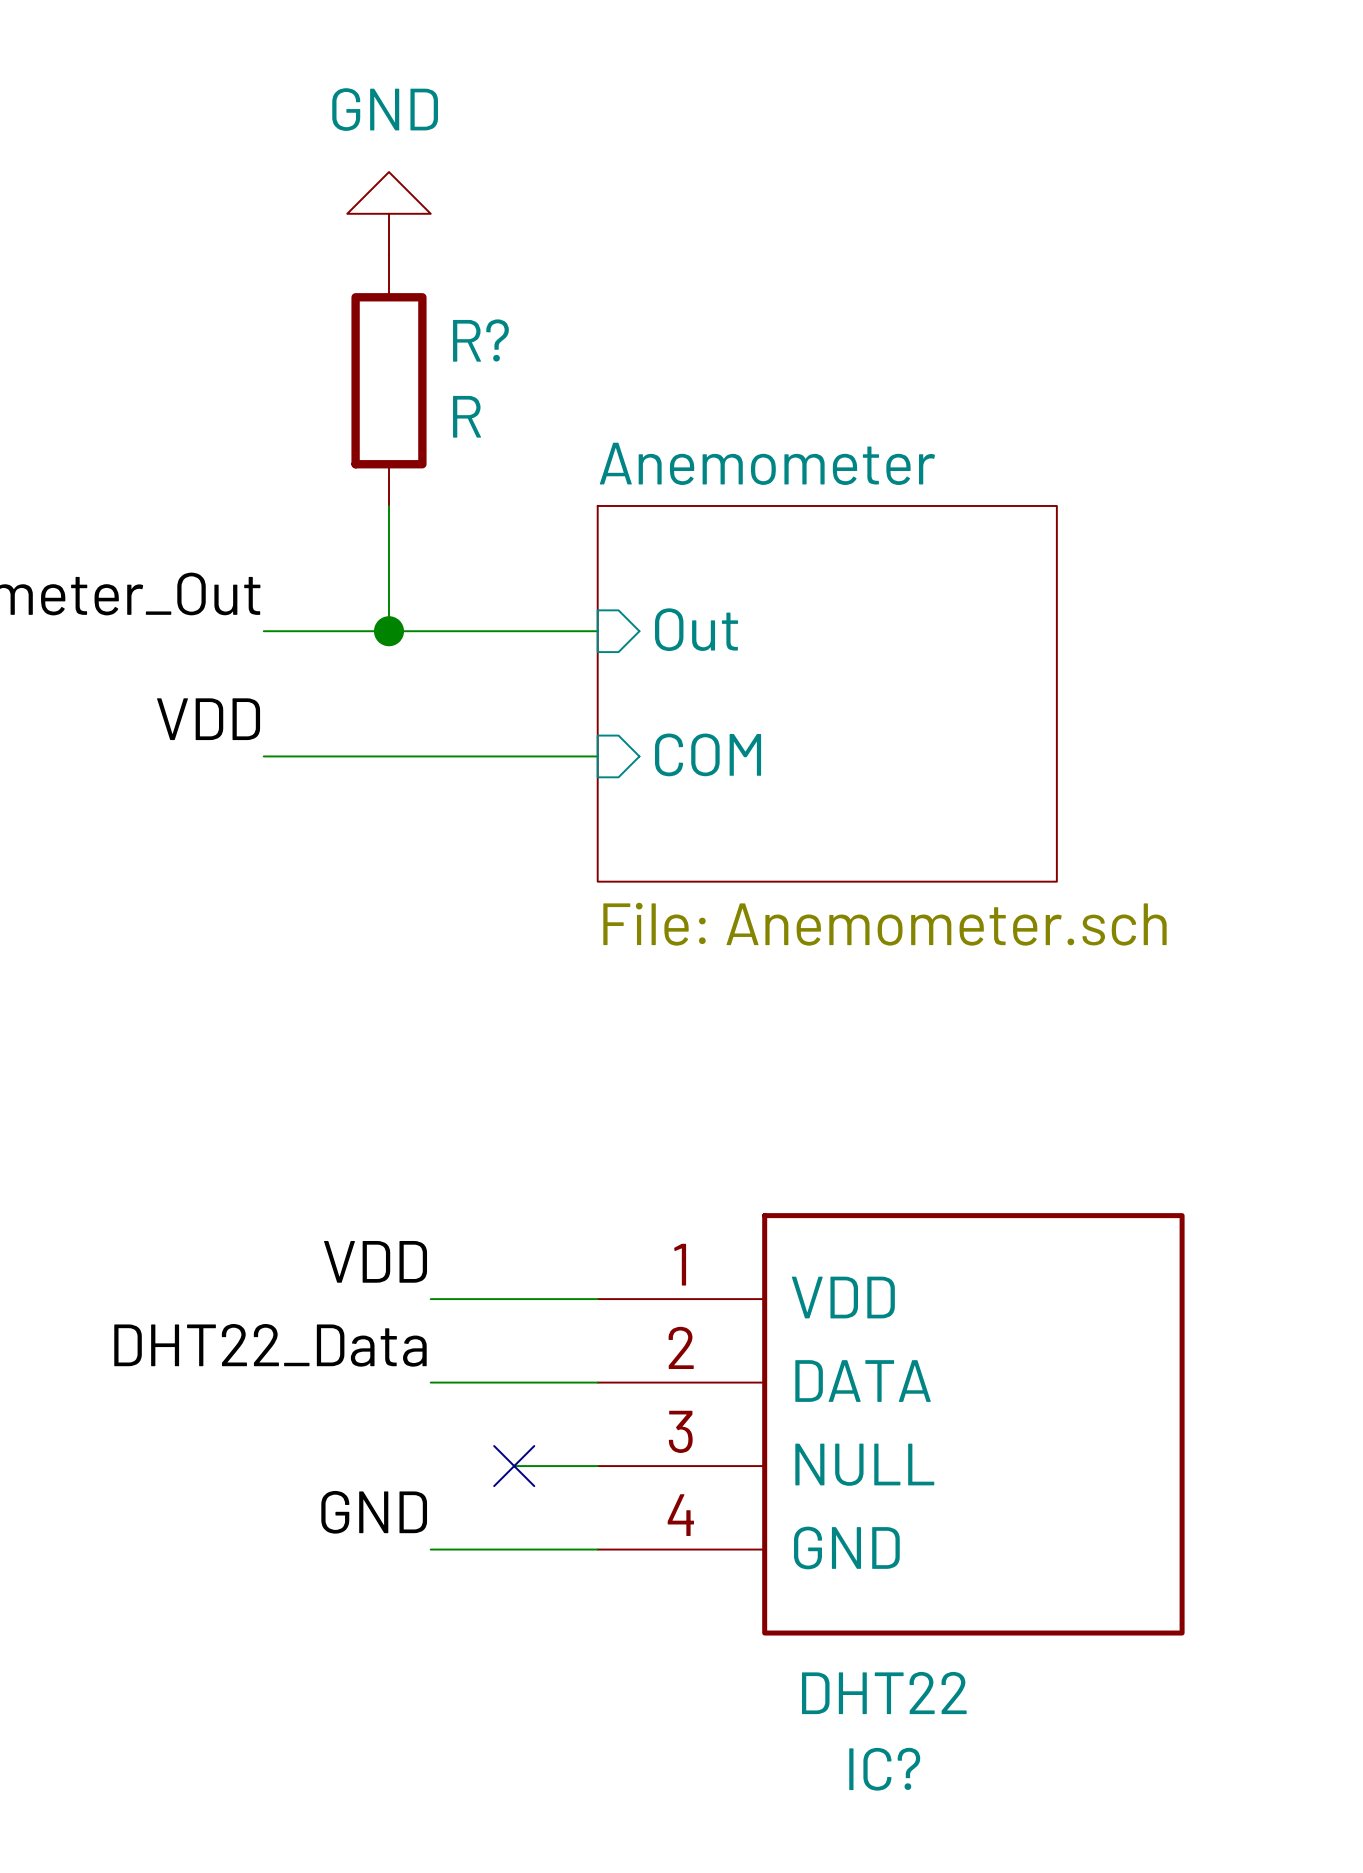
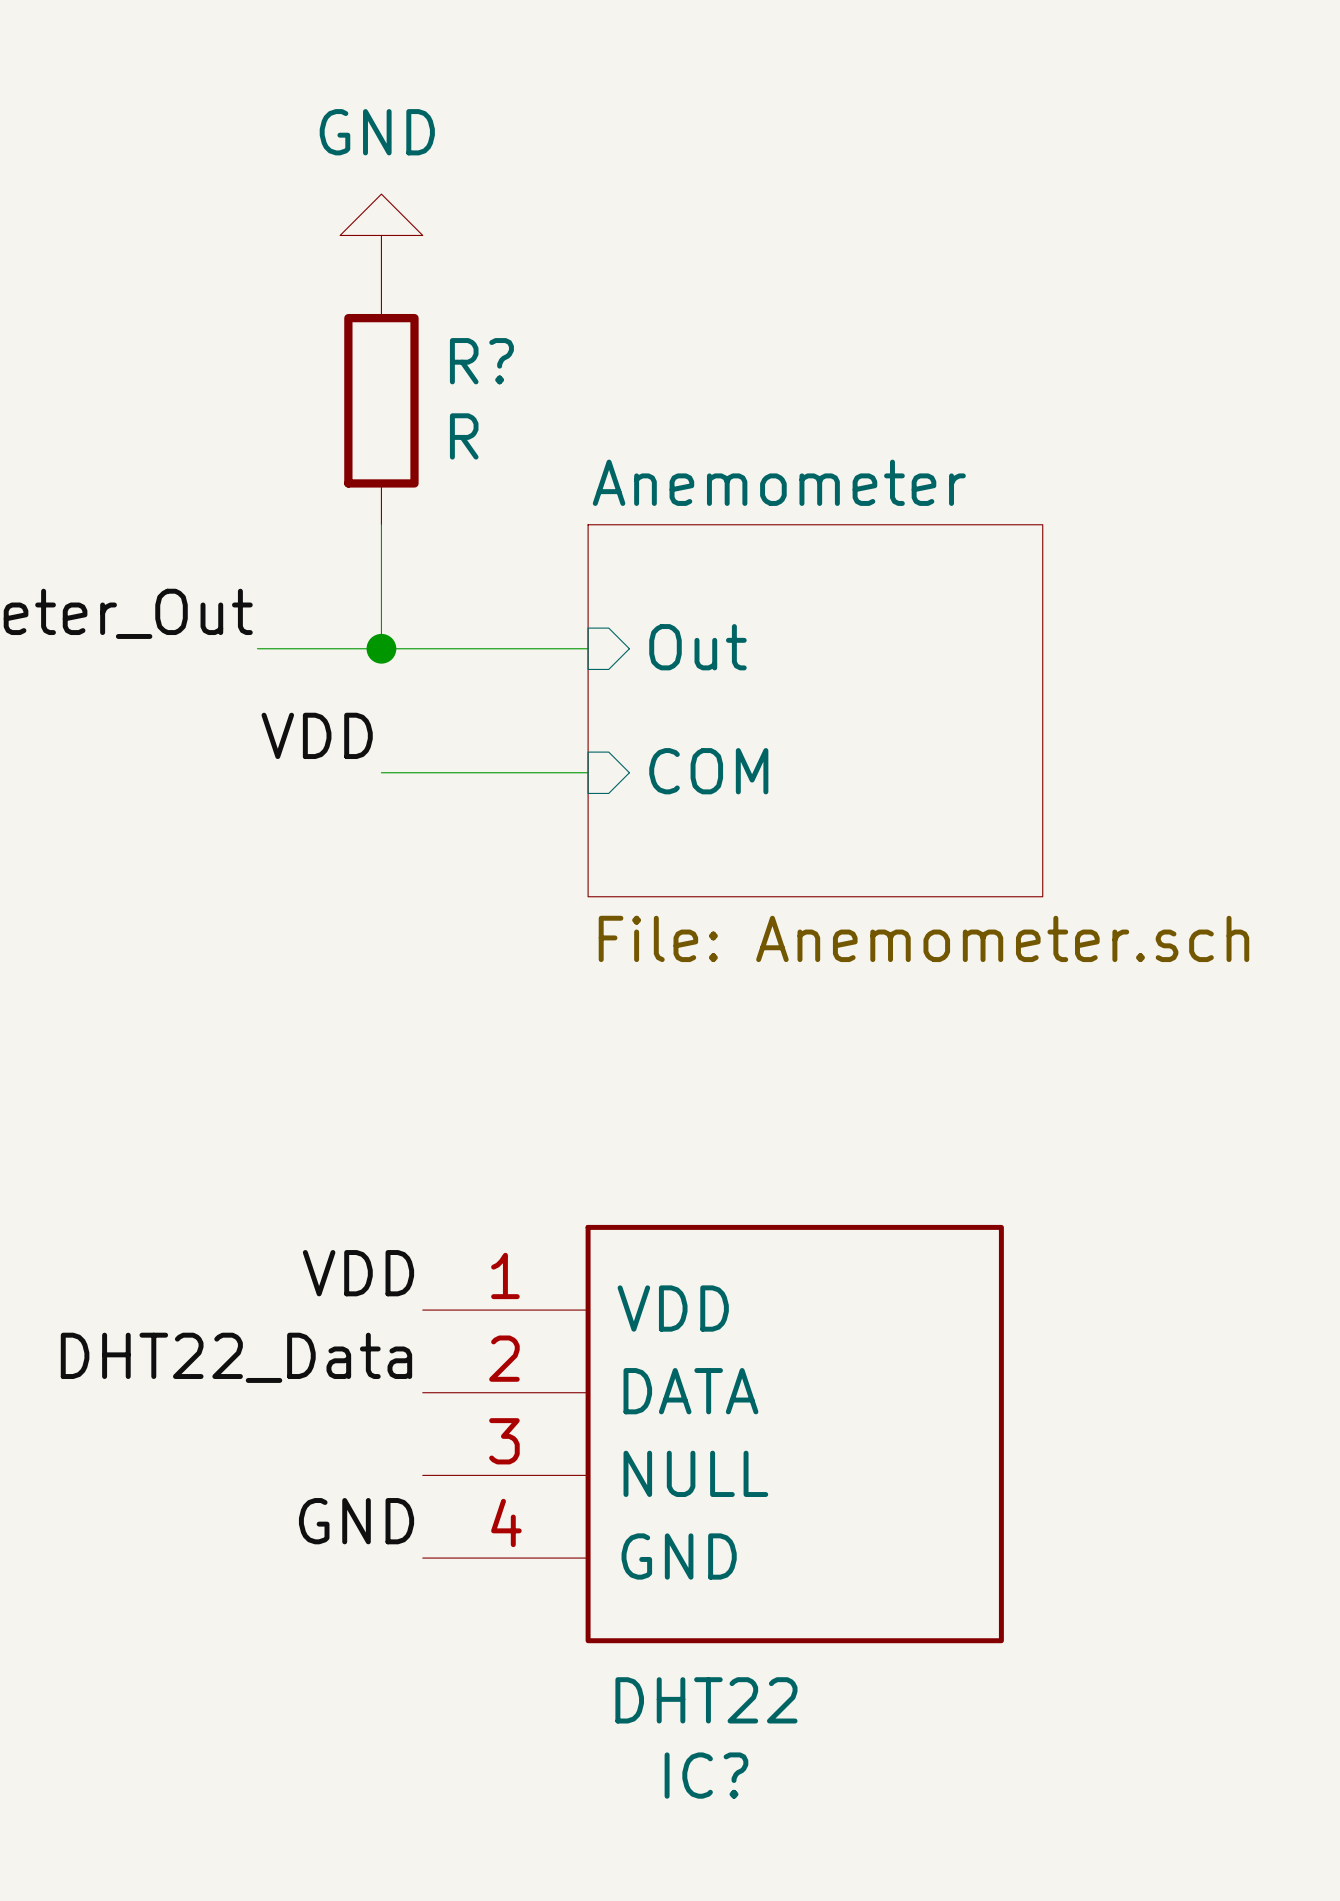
label position: VDD (208, 719) -> VDD (317, 735)
wire: (263, 756) (388, 756) -> none
IC? position: (891, 1424) -> (713, 1434)
no-connect mark: (514, 1466) -> none

